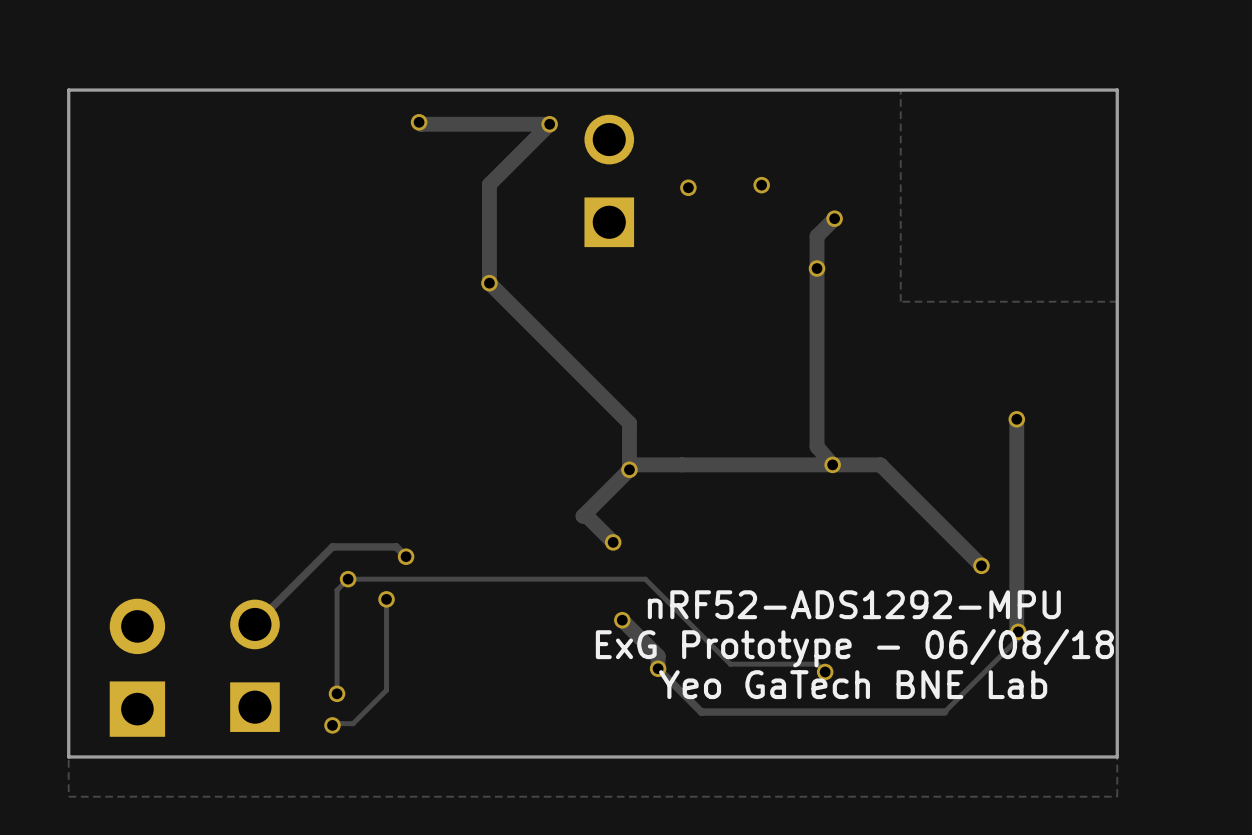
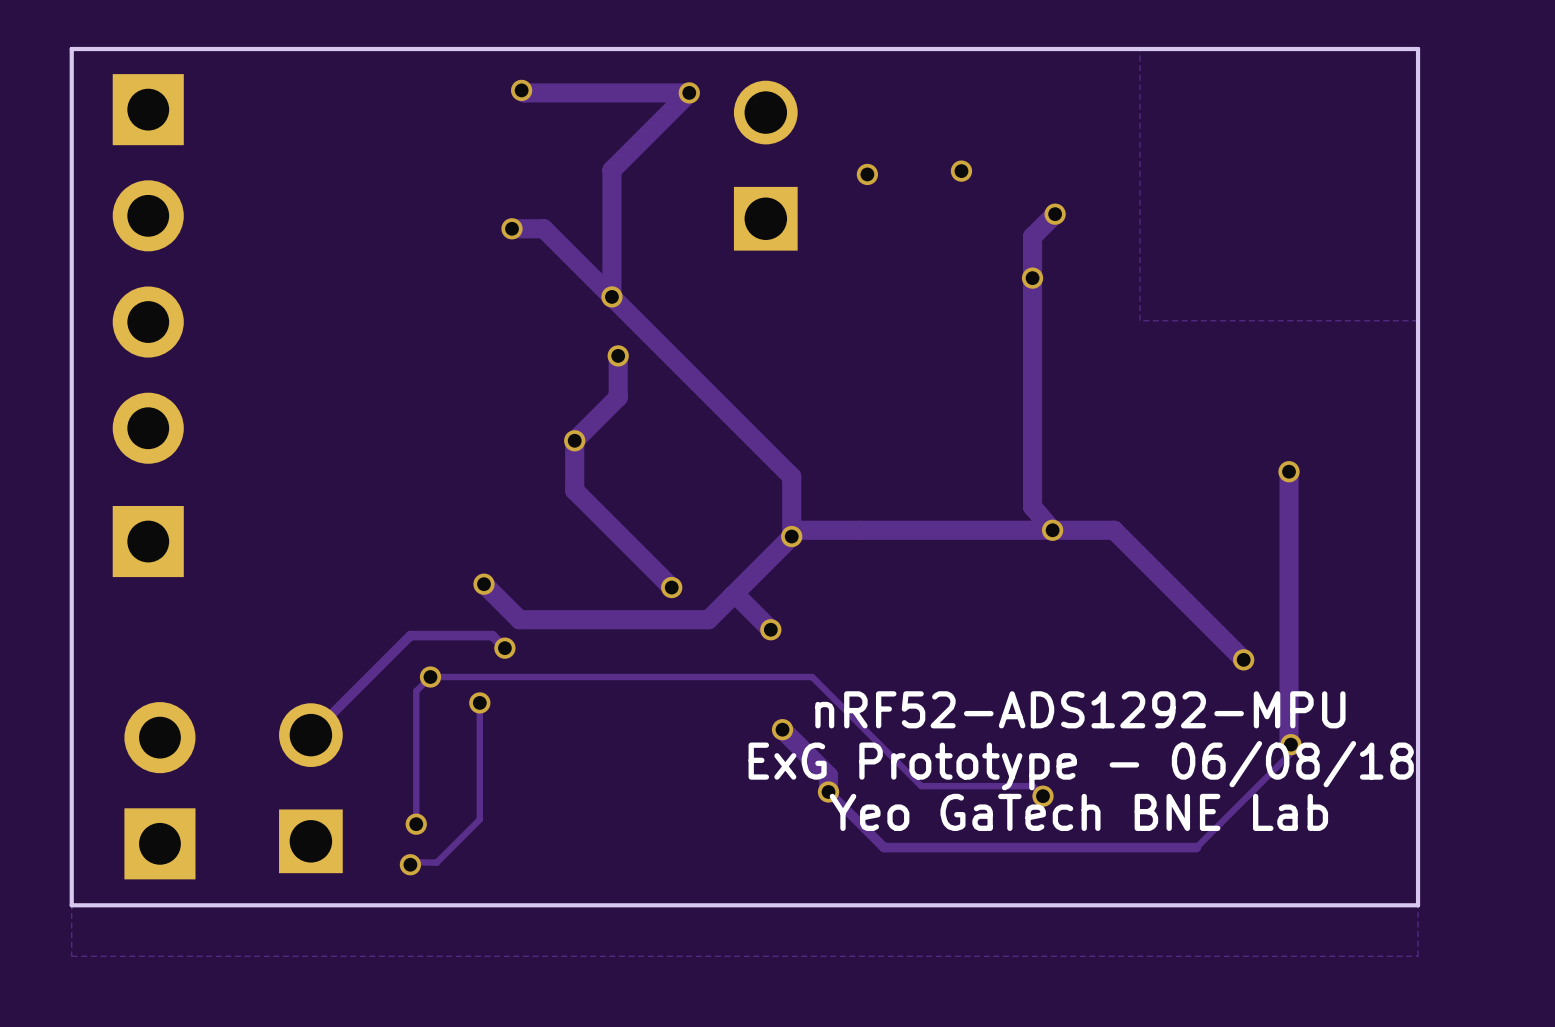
track: none -> (512, 228) (543, 228) (611, 296)
via: none -> (512, 228)
part: none -> (148, 268)
track: none -> (618, 355) (618, 397) (574, 440) (574, 490) (671, 587)
via: none -> (618, 355)
via: none -> (574, 440)
part: none -> (148, 541)
track: none -> (483, 584) (519, 619) (708, 619) (732, 596)
via: none -> (483, 584)
via: none -> (671, 587)

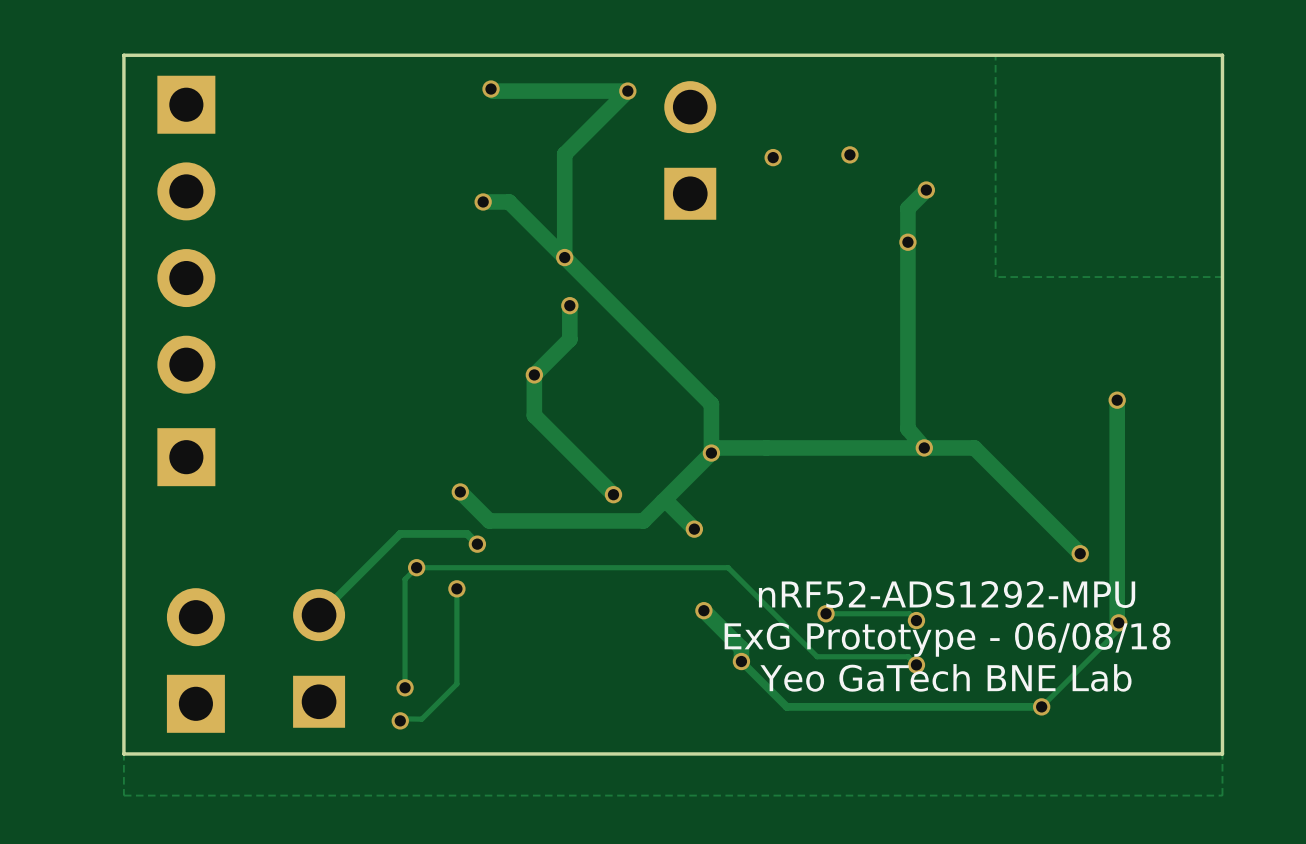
track: none -> (826, 613) (909, 613) (916, 620)
via: none -> (826, 613)
via: none -> (916, 620)
via: none -> (1041, 706)

